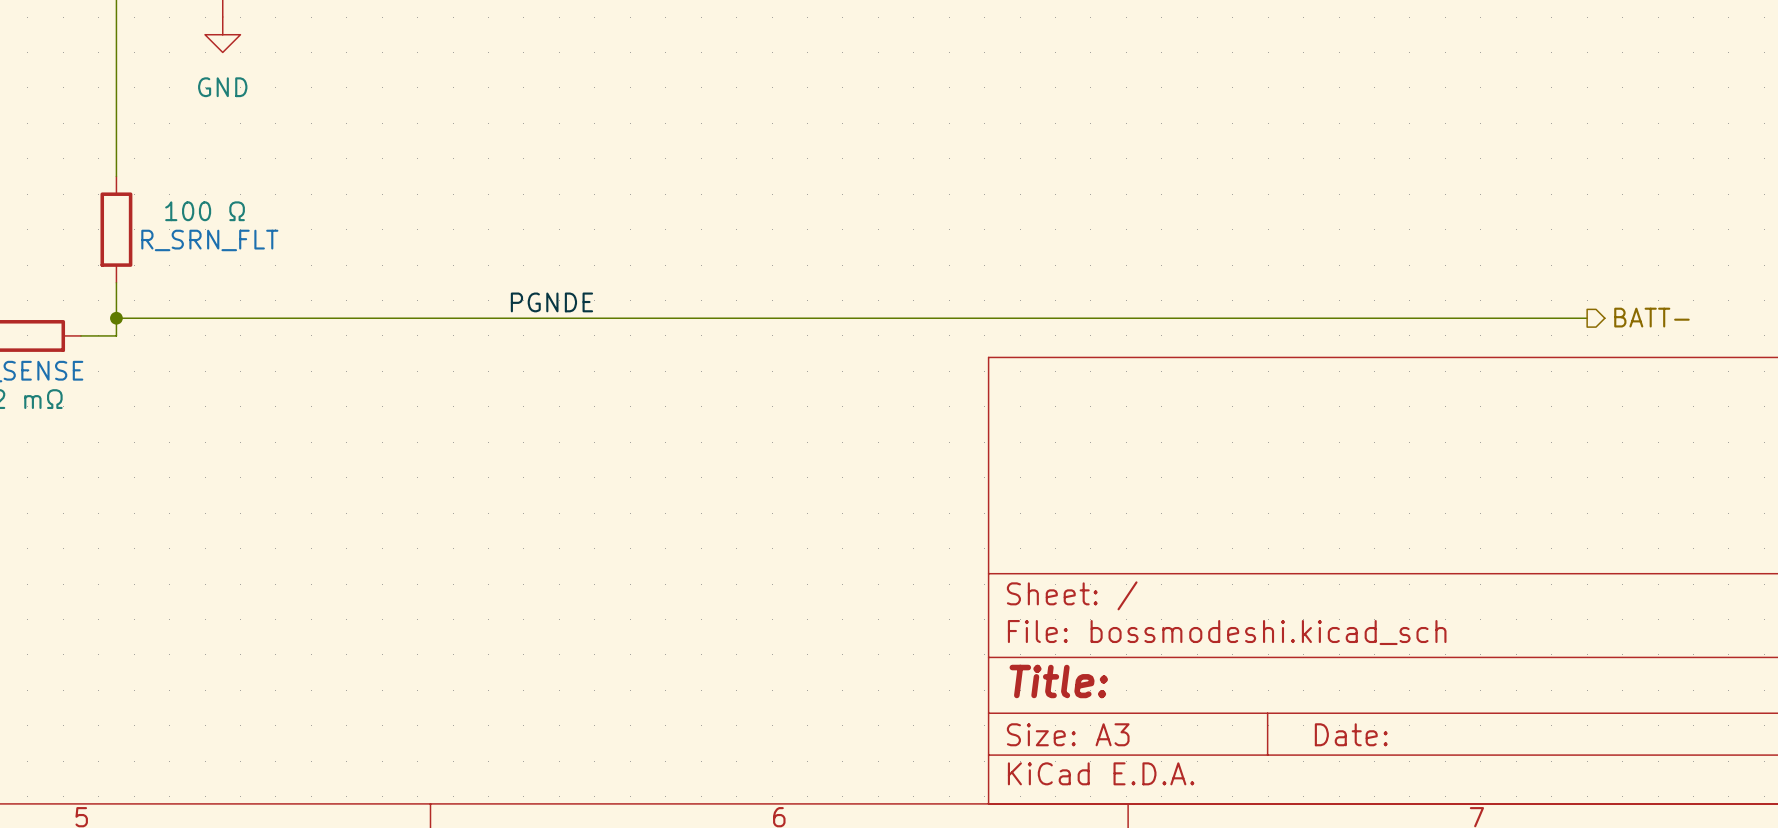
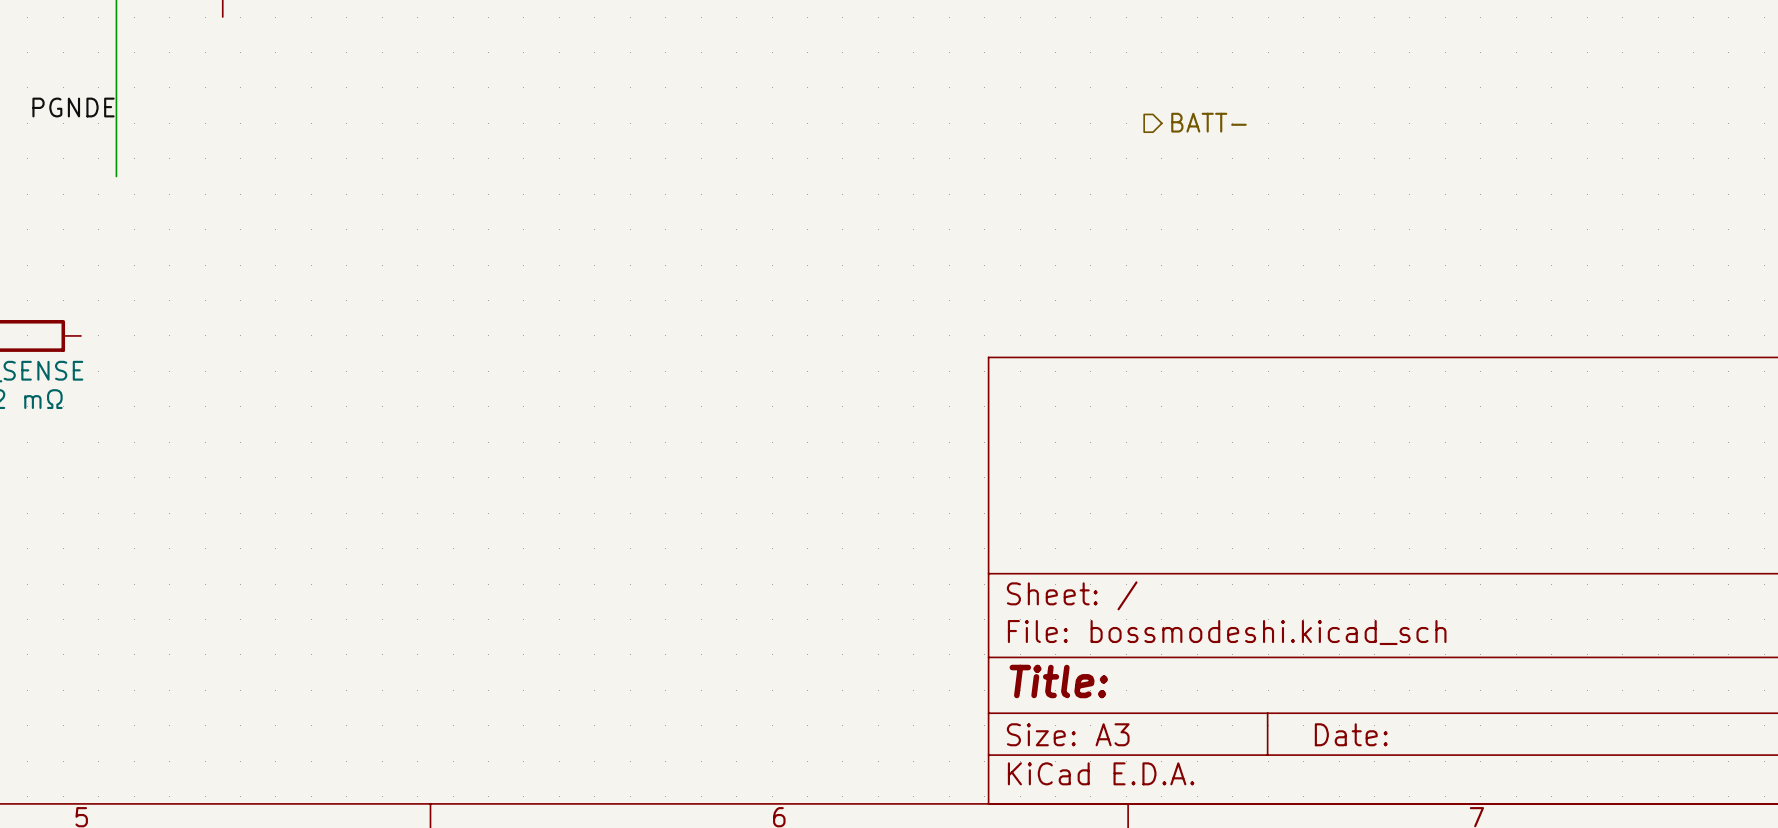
power symbol: GND (222, 34) -> none
label: none -> PGNDE (73, 107)
hierarchical label: none -> BATT- (1208, 122)
R_SRN_FLT: 100 Ω (116, 229) -> none
wire: (116, 282) (116, 335) (80, 335) -> none
label: PGNDE (551, 302) -> none
hierarchical label: BATT- (1651, 317) -> none
wire: (116, 318) (1587, 318) -> none
junction: (116, 318) -> none

